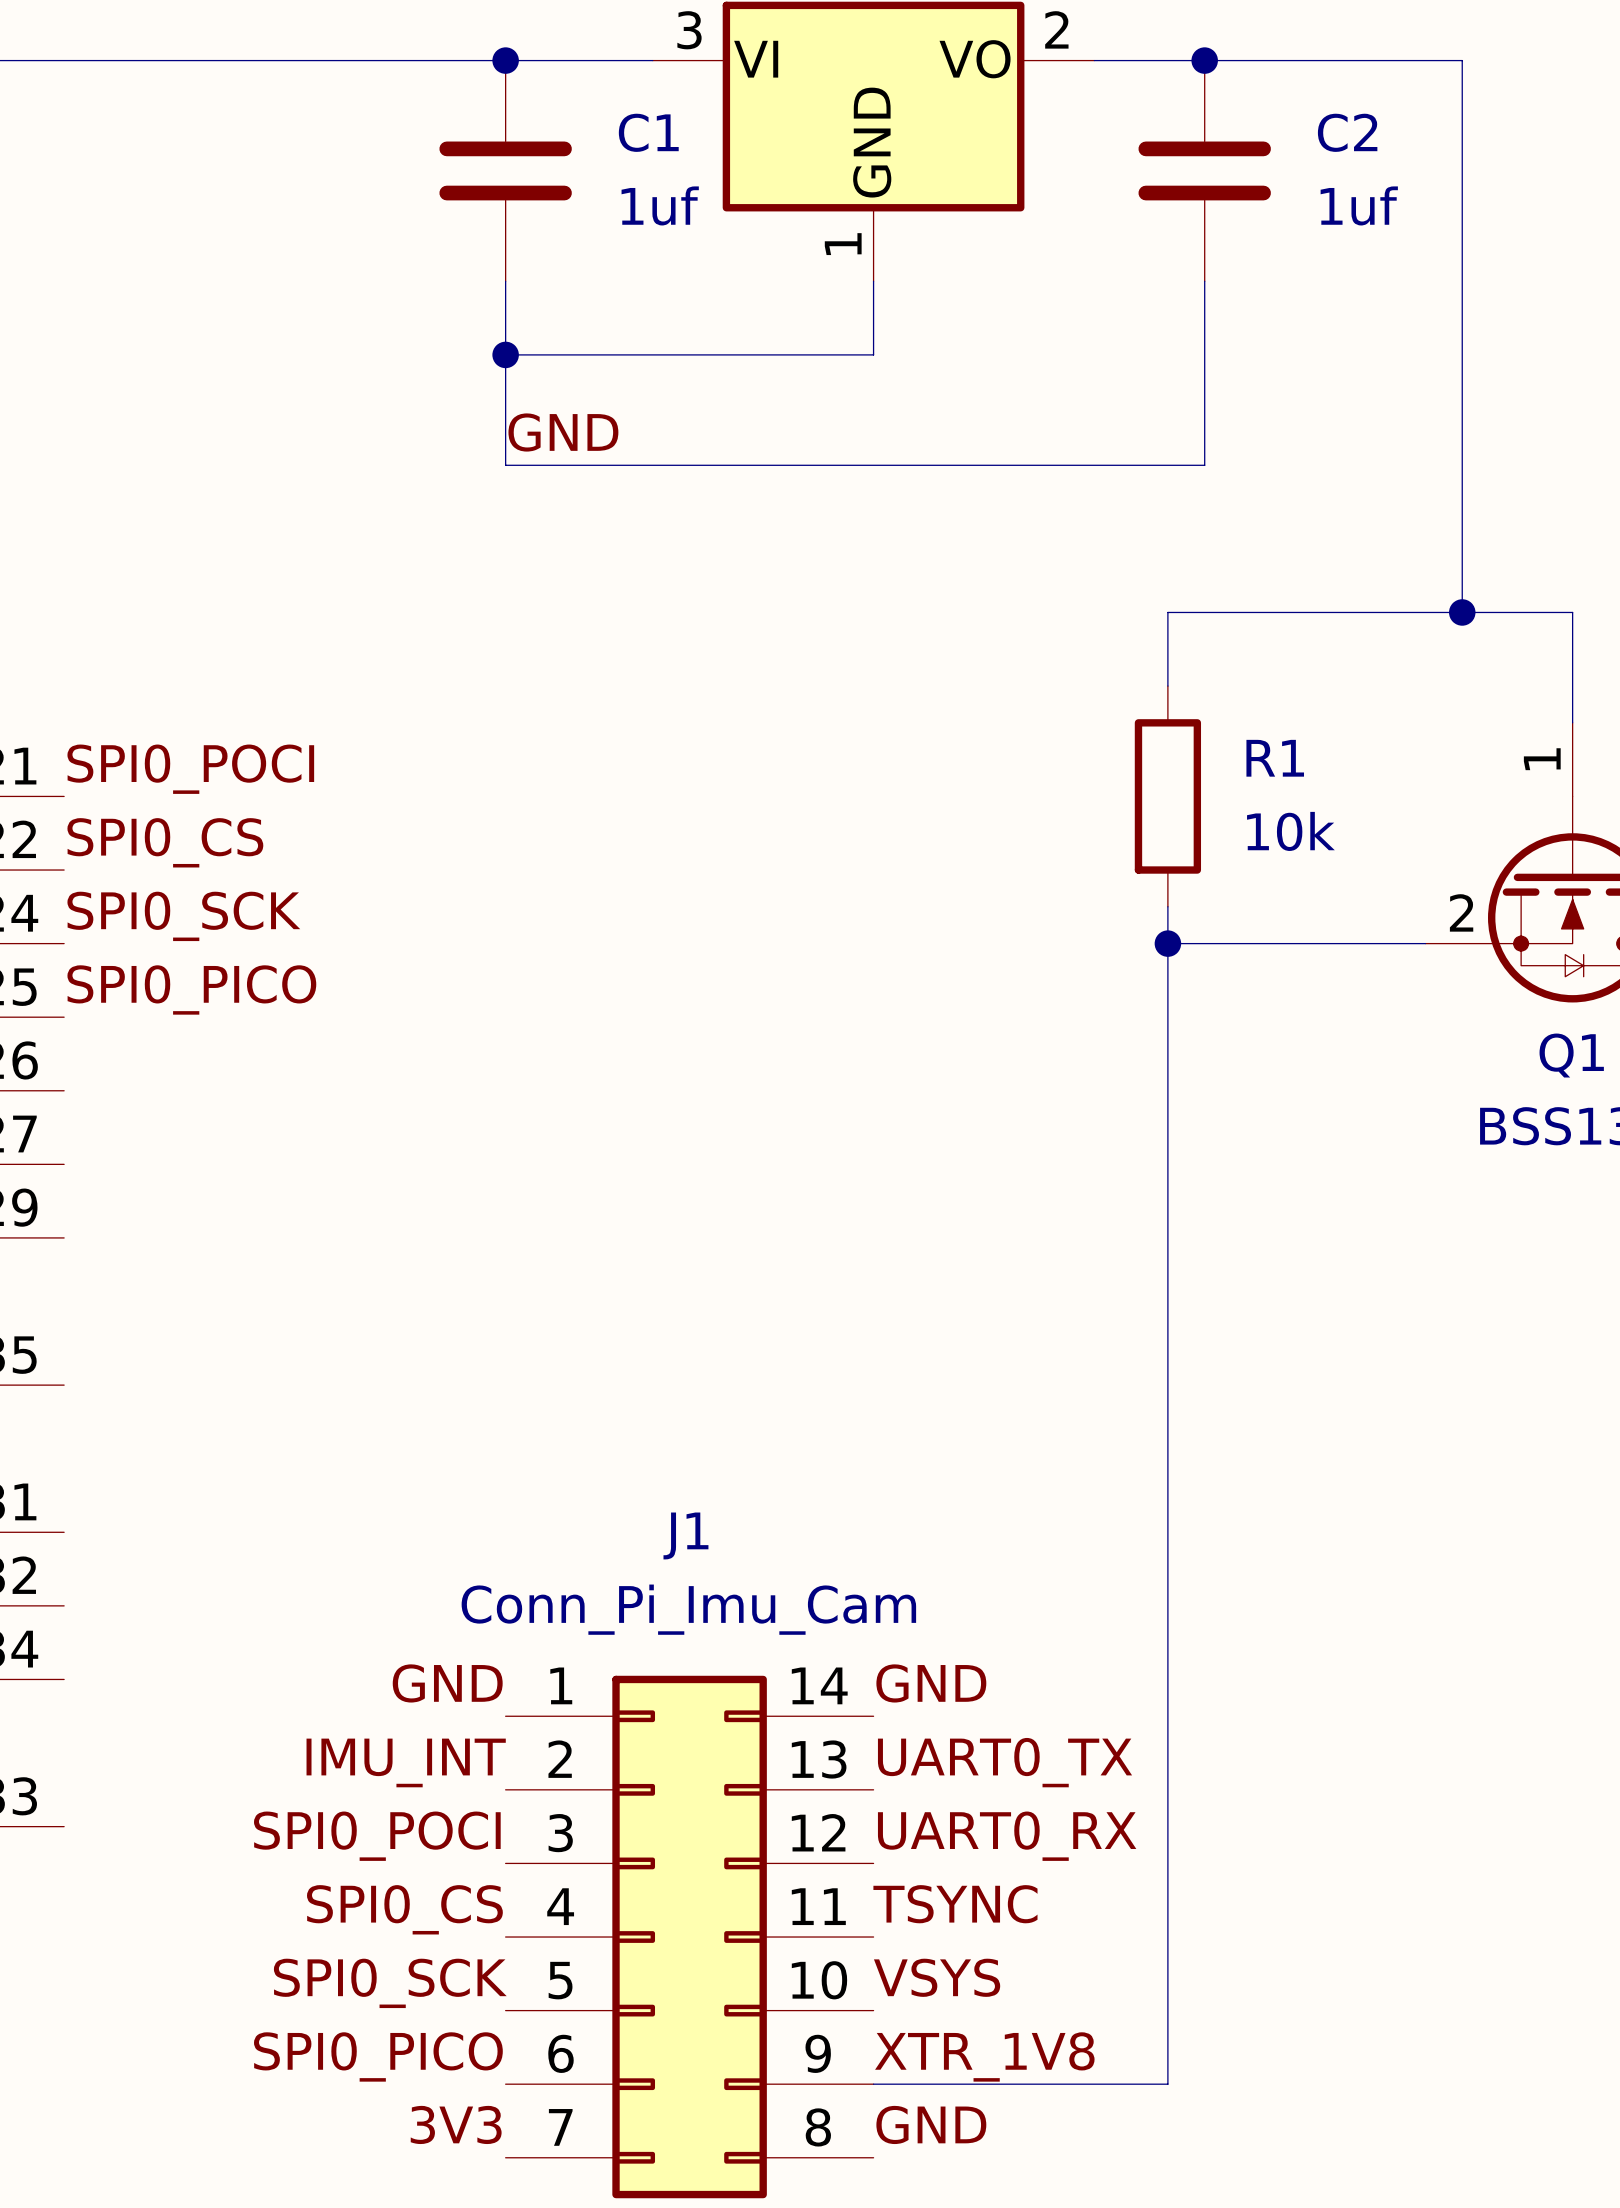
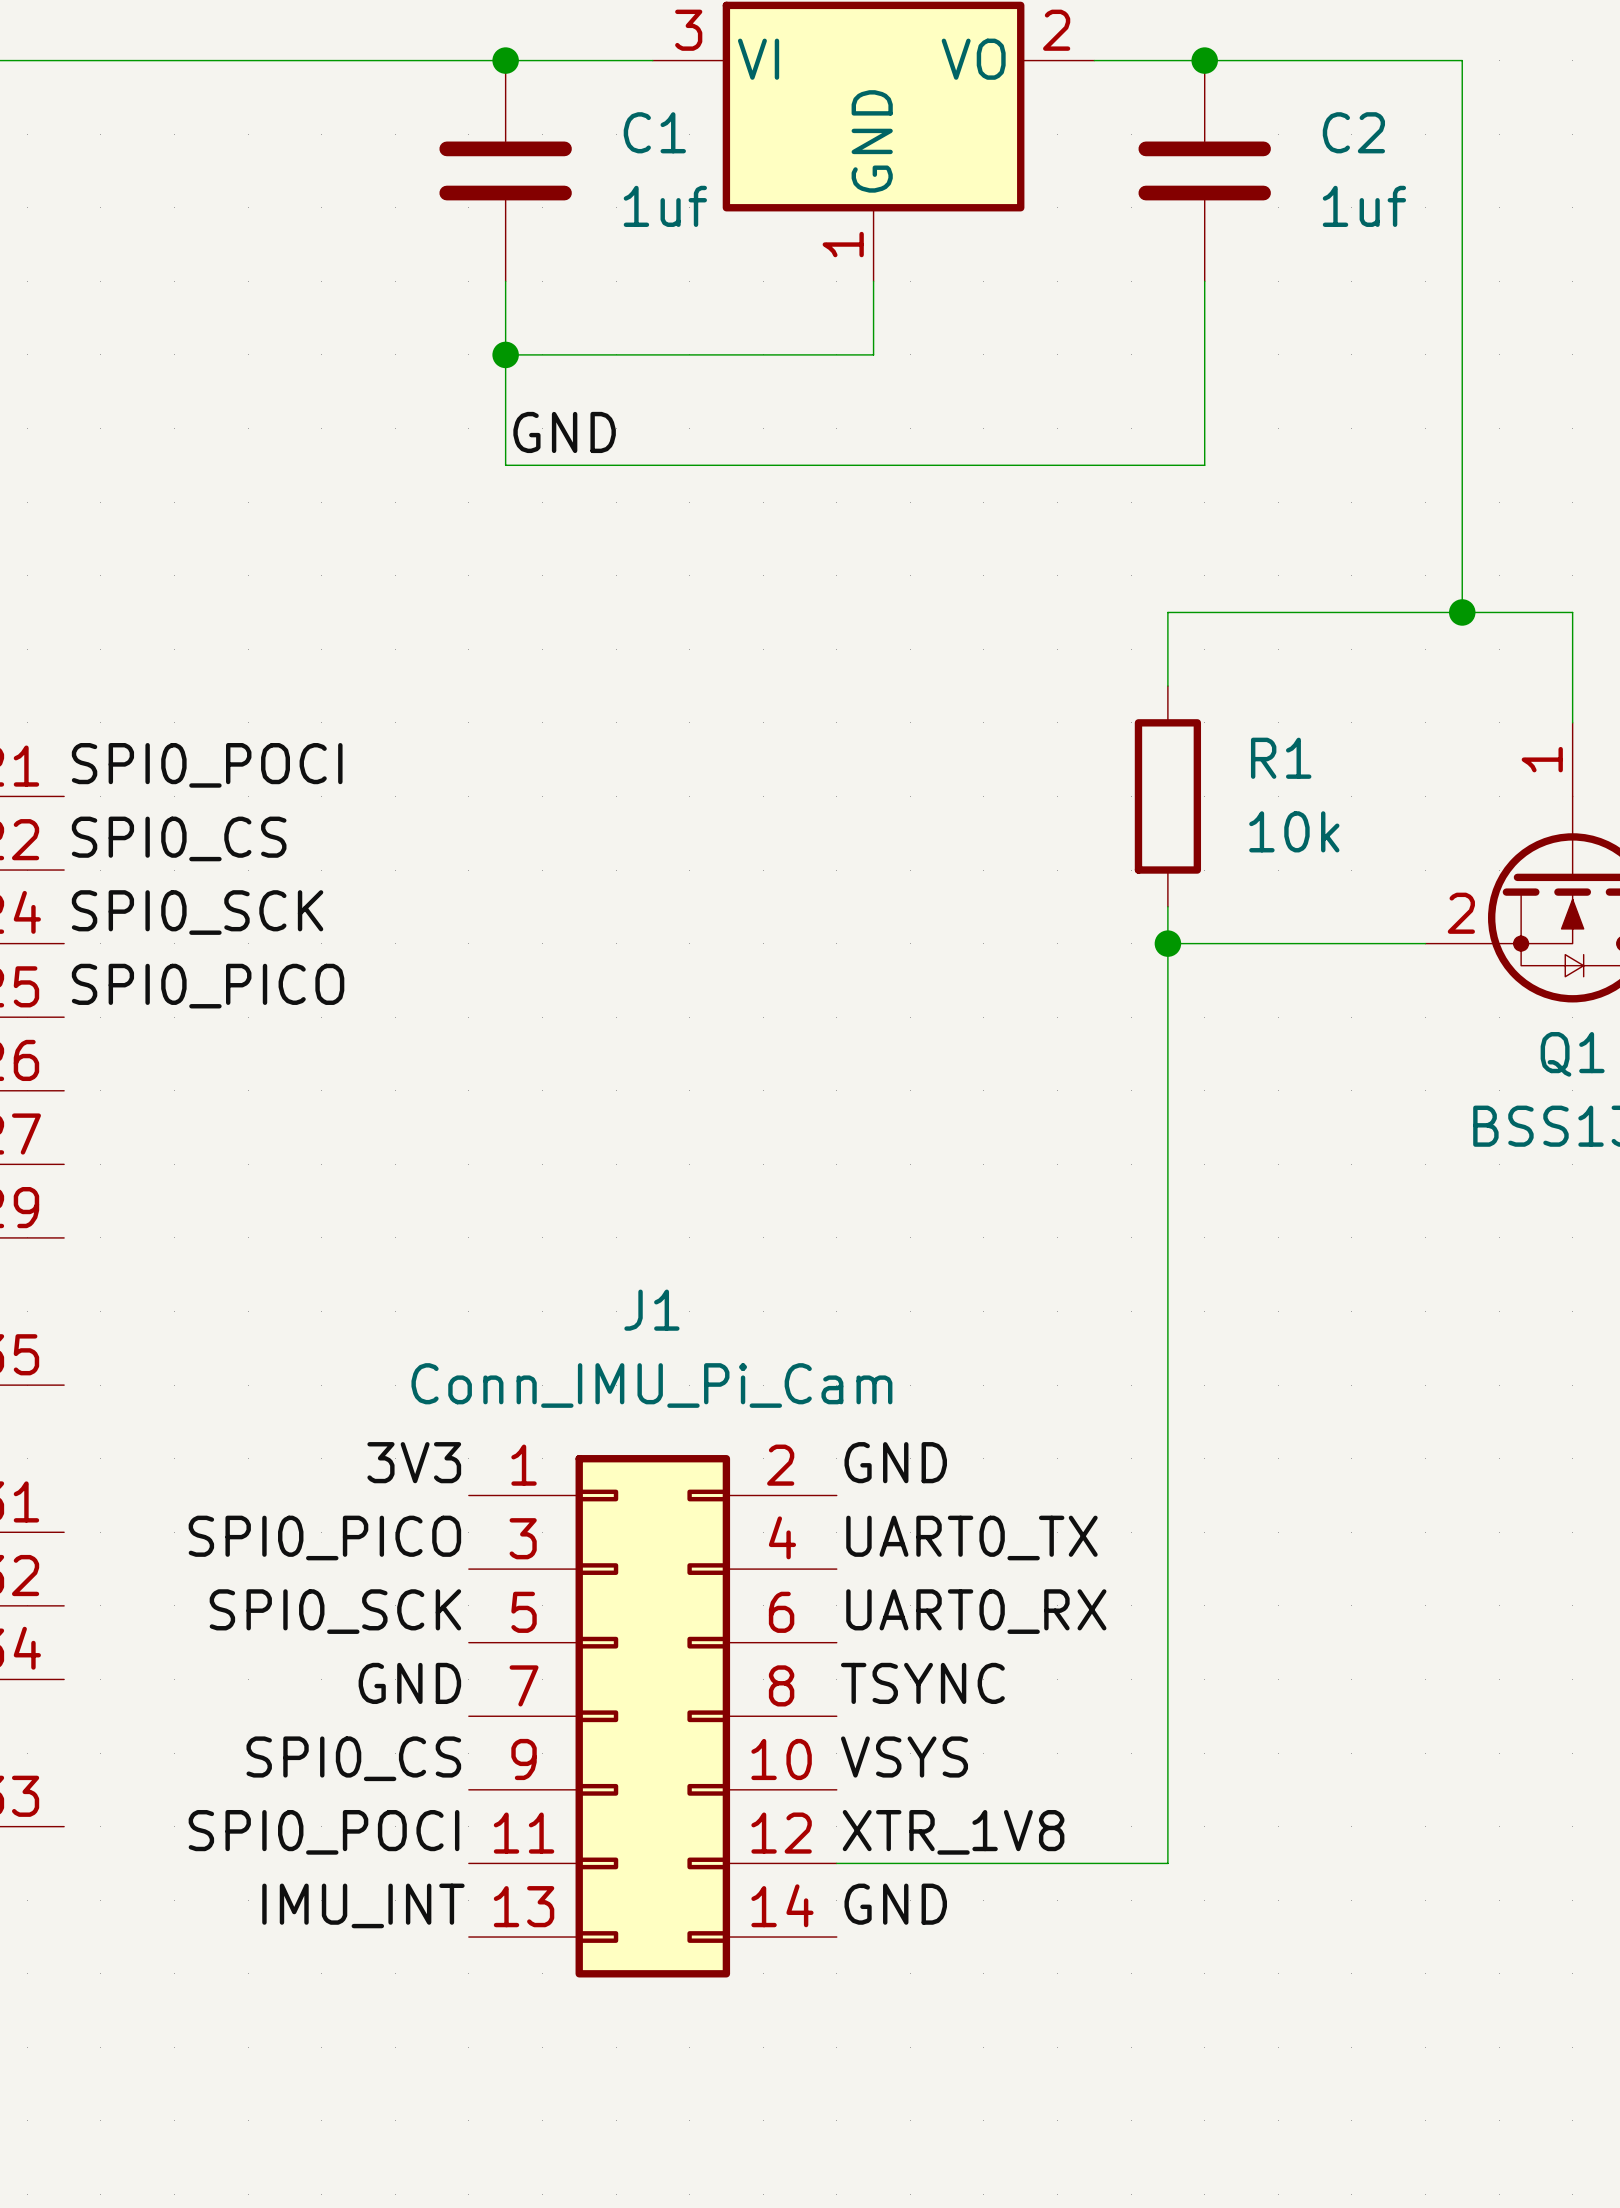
label: none -> GND (895, 1462)
J1 value: Conn_Pi_Imu_Cam (688, 1609) -> Conn_IMU_Pi_Cam (651, 1385)
J1 symbol: [505, 1675, 874, 2199] -> [468, 1455, 837, 1978]
label position: GND (447, 1683) -> GND (409, 1683)
label: GND (931, 1683) -> none
label position: IMU_INT (406, 1762) -> IMU_INT (363, 1905)
label position: UART0_TX (1005, 1762) -> UART0_TX (971, 1538)
label position: SPI0_POCI (377, 1836) -> SPI0_POCI (324, 1832)
label position: UART0_RX (1007, 1836) -> UART0_RX (976, 1611)
wire: (1167, 1863) (1167, 2084) (873, 2084) -> (1167, 1863) (836, 1863)
label: none -> GND (895, 1904)
label position: TSYNC (955, 1904) -> TSYNC (922, 1683)
label position: SPI0_CS (404, 1909) -> SPI0_CS (353, 1758)
label position: VSYS (937, 1977) -> VSYS (904, 1757)
label position: SPI0_SCK (390, 1983) -> SPI0_SCK (335, 1611)
label position: SPI0_PICO (378, 2056) -> SPI0_PICO (324, 1538)
label position: XTR_1V8 (984, 2056) -> XTR_1V8 (953, 1832)
label position: 3V3 (456, 2124) -> 3V3 (414, 1462)
label: GND (931, 2124) -> none

